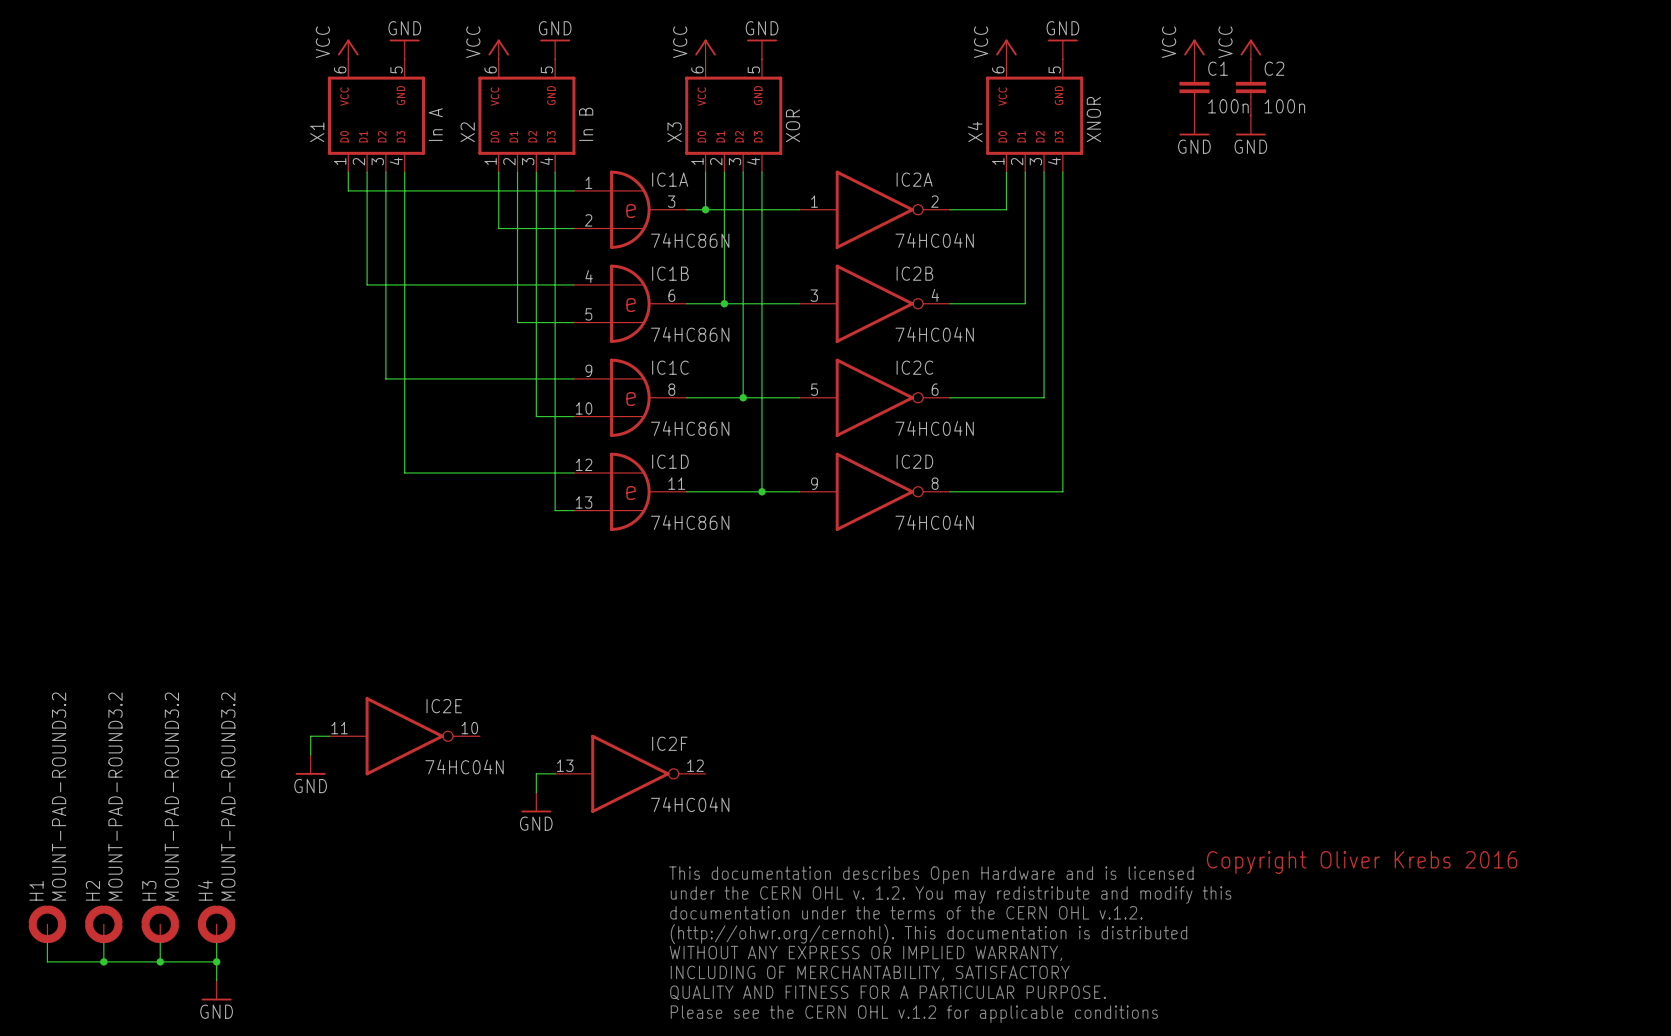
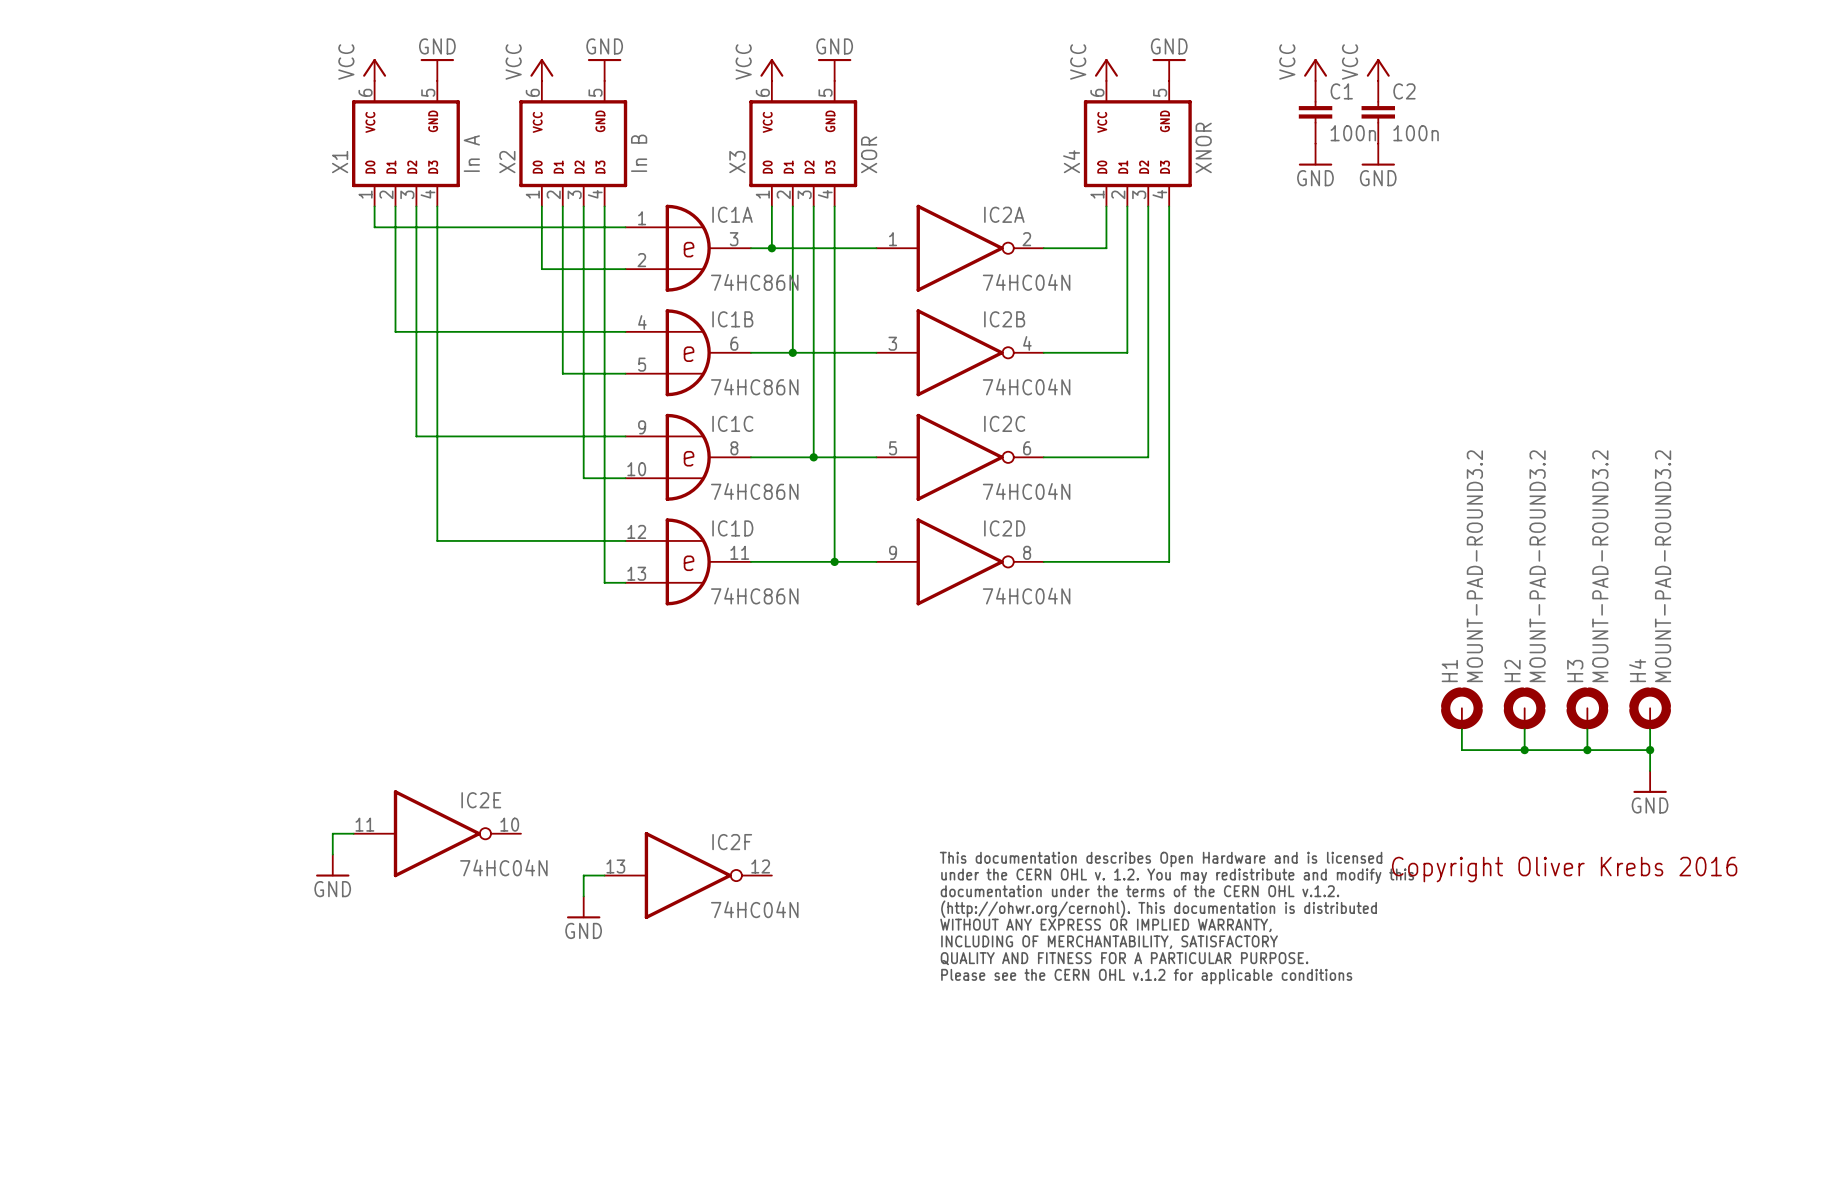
wire: none -> (1461, 729) (1461, 750) (1650, 750)
wire: none -> (1524, 729) (1524, 750)
wire: none -> (1587, 729) (1587, 750)
wire: none -> (1650, 729) (1650, 770)
junction: none -> (1524, 750)
junction: none -> (1587, 750)
junction: none -> (1650, 750)
power symbol: none -> GND (1650, 781)
text: none -> This documentation describes Open Hardware and is licensed (1161, 859)
text: none -> under the CERN OHL v. 1.2. You may redistribute and modify this (1177, 876)
text: none -> documentation under the terms of the CERN OHL v.1.2. (1140, 891)
text: none -> (http://ohwr.org/cernohl). This documentation is distributed (1159, 909)
text: none -> WITHOUT ANY EXPRESS OR IMPLIED WARRANTY, (1105, 925)
text: none -> INCLUDING OF MERCHANTABILITY, SATISFACTORY (1109, 942)
text: none -> QUALITY AND FITNESS FOR A PARTICULAR PURPOSE. (1124, 958)
text position: Copyright Oliver Krebs 2016 (1362, 862) -> Copyright Oliver Krebs 2016 (1564, 869)
text: none -> Please see the CERN OHL v.1.2 for applicable conditions (1146, 976)
text: This documentation describes Open Hardware and is licensed (931, 875) -> none
text: under the CERN OHL v. 1.2. You may redistribute and modify this (951, 895) -> none
text: documentation under the terms of the CERN OHL v.1.2. (906, 912) -> none
H1 position: (47, 924) -> (1461, 708)
H2 position: (103, 924) -> (1524, 708)
H3 position: (160, 924) -> (1587, 708)
H4 position: (216, 924) -> (1650, 708)
text: (http://ohwr.org/cernohl). This documentation is distributed (928, 934) -> none
wire: (47, 943) (47, 961) (216, 961) -> none
wire: (103, 943) (103, 961) -> none
wire: (160, 943) (160, 961) -> none
wire: (216, 943) (216, 980) -> none
text: WITHOUT ANY EXPRESS OR IMPLIED WARRANTY, (865, 953) -> none
junction: (103, 961) -> none
junction: (160, 961) -> none
junction: (216, 961) -> none
text: INCLUDING OF MERCHANTABILITY, SATISFACTORY (870, 973) -> none
power symbol: GND (216, 990) -> none
text: QUALITY AND FITNESS FOR A PARTICULAR PURPOSE. (888, 992) -> none
text: Please see the CERN OHL v.1.2 for applicable conditions (914, 1014) -> none

